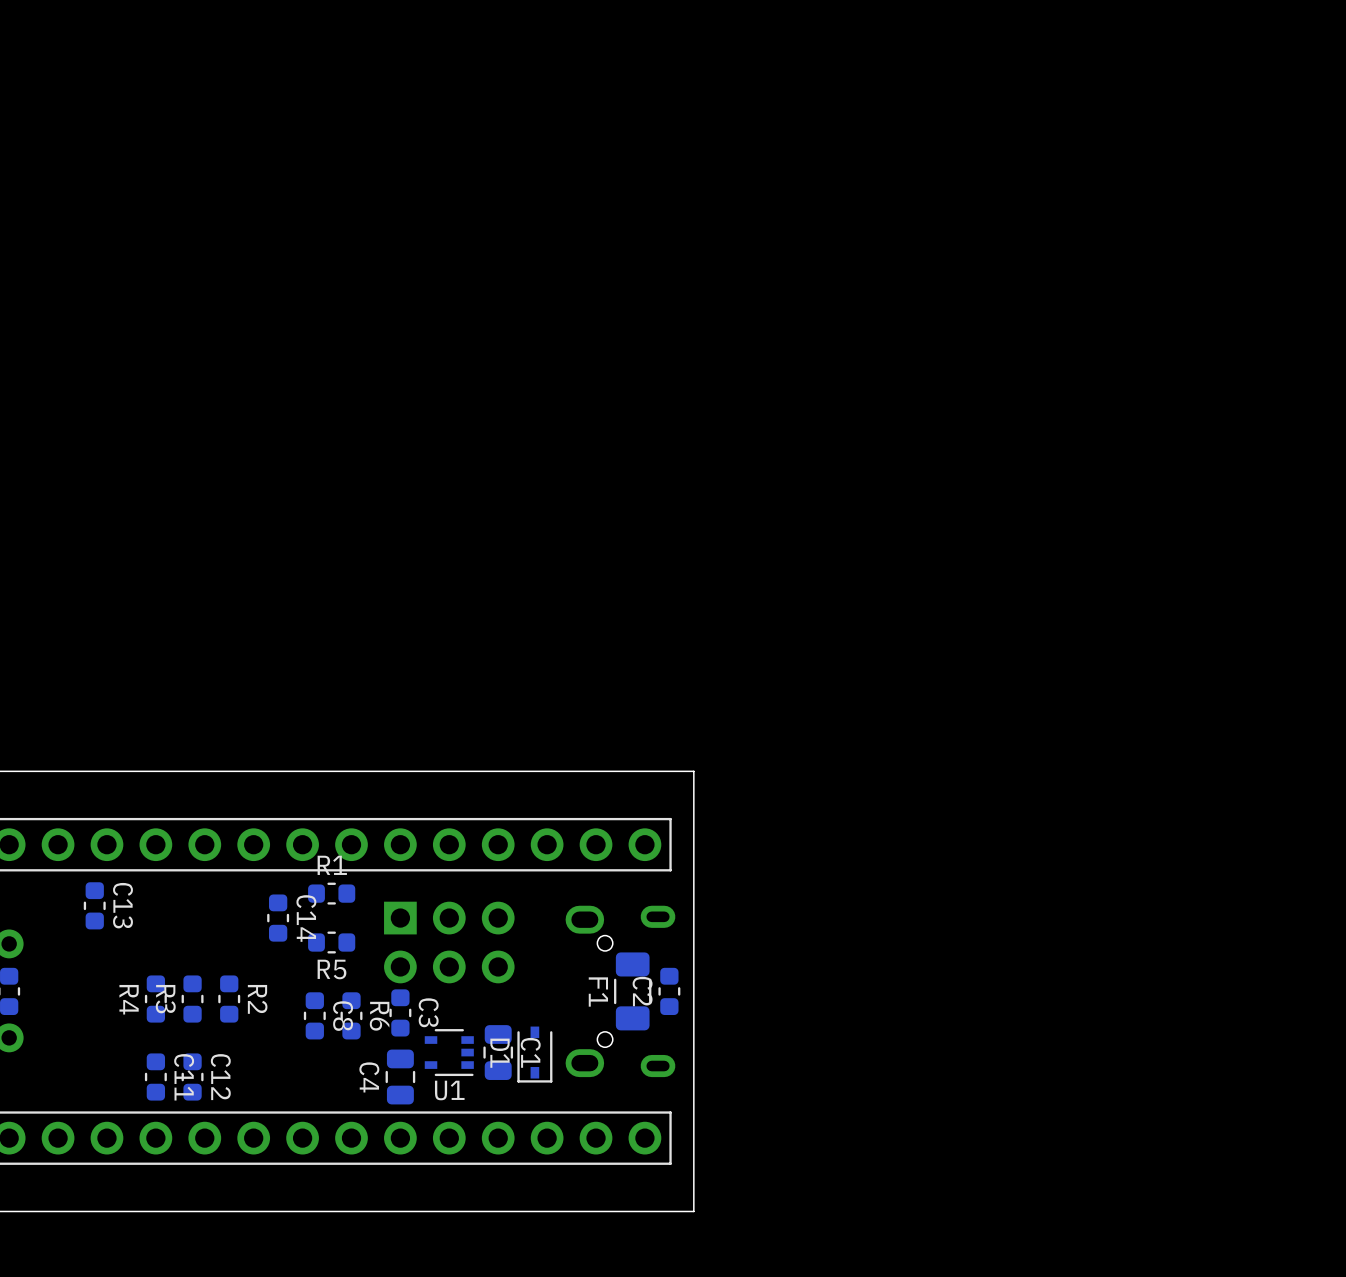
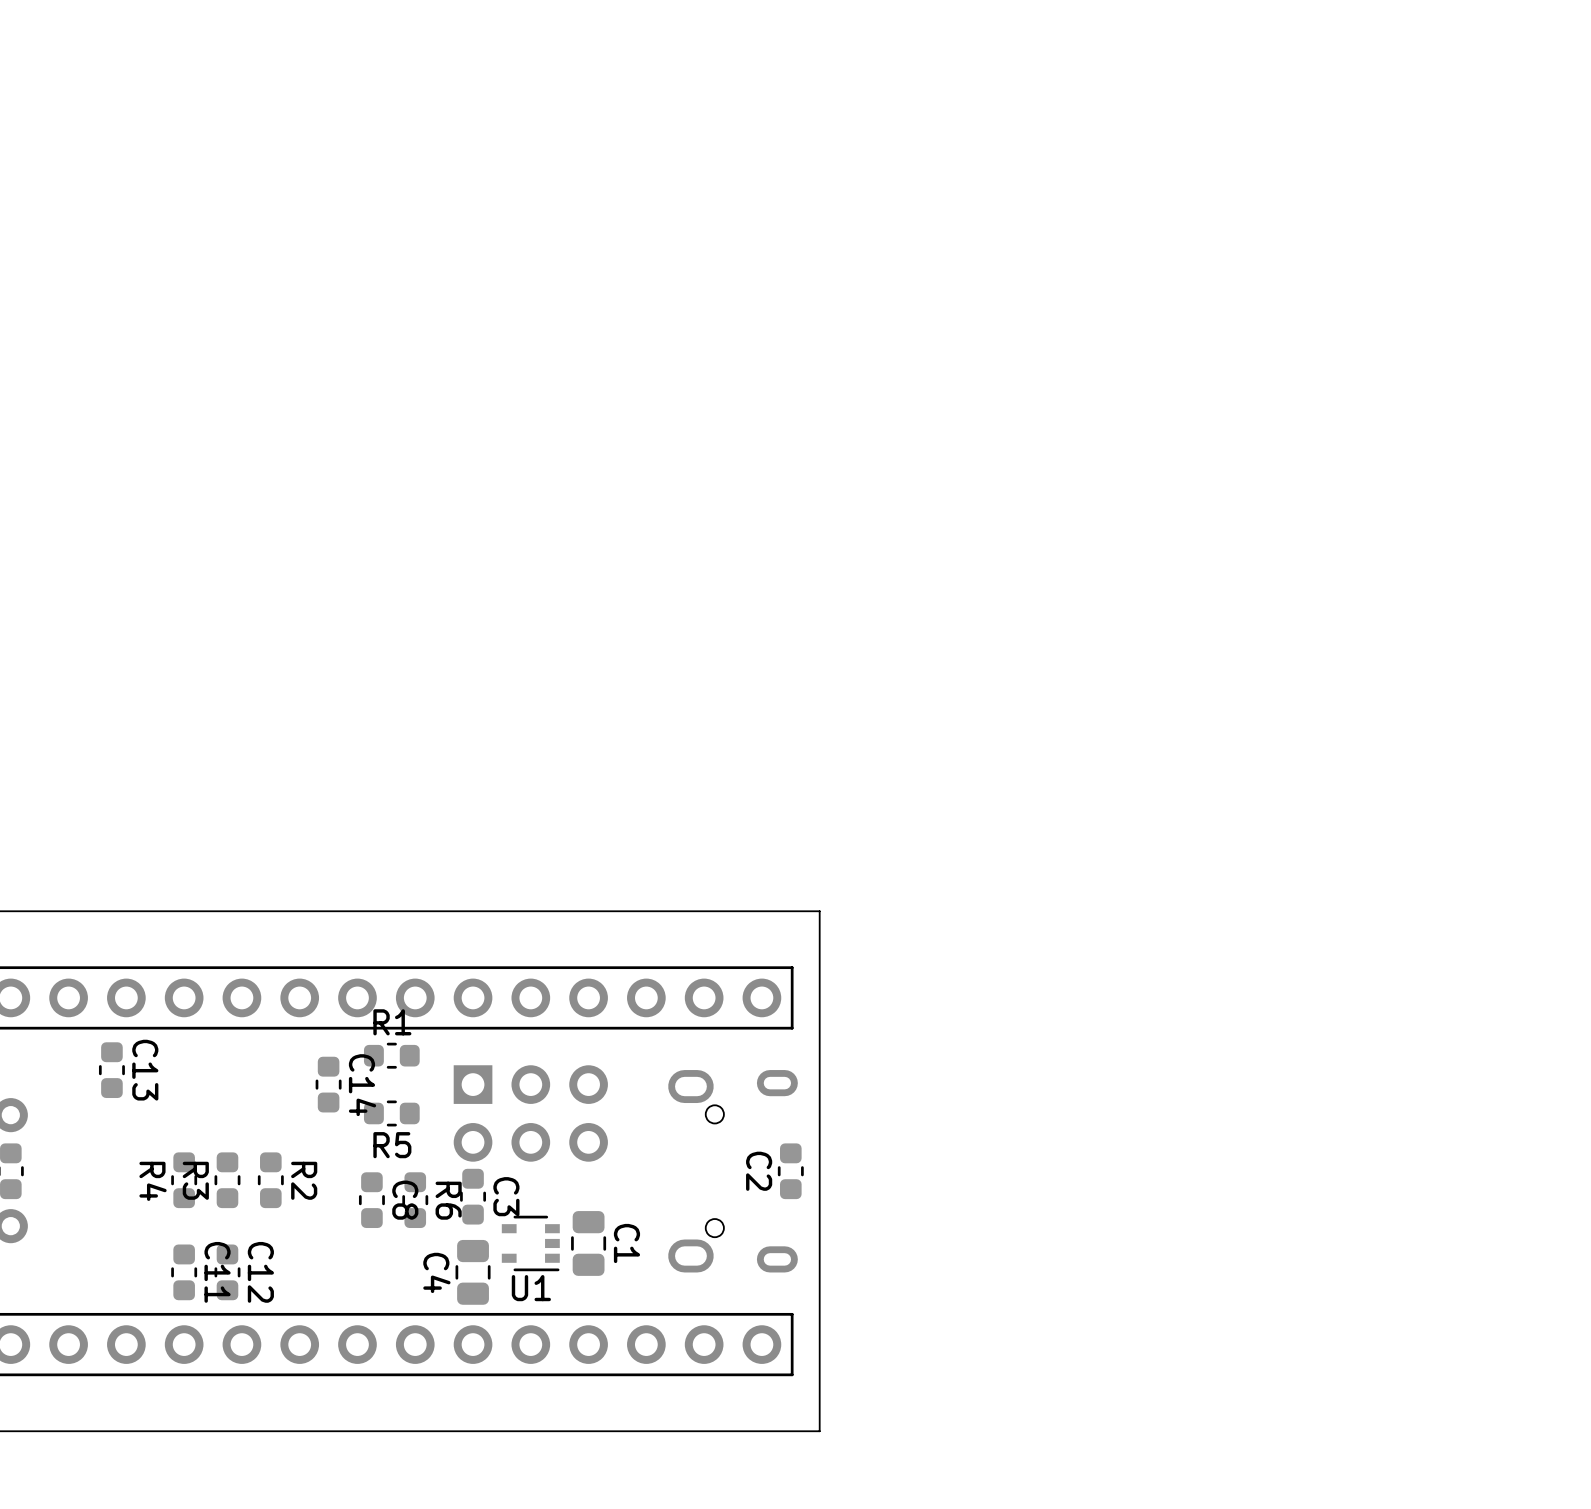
F1: (632, 991) -> none
D1: (534, 1054) -> none

